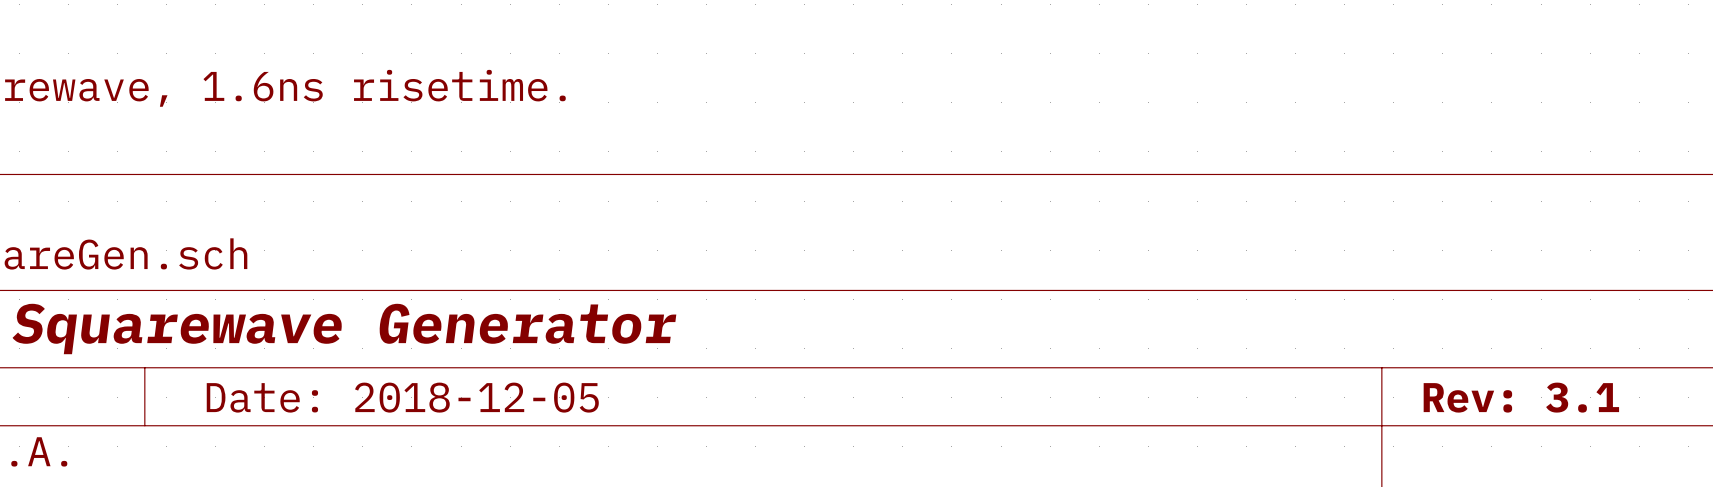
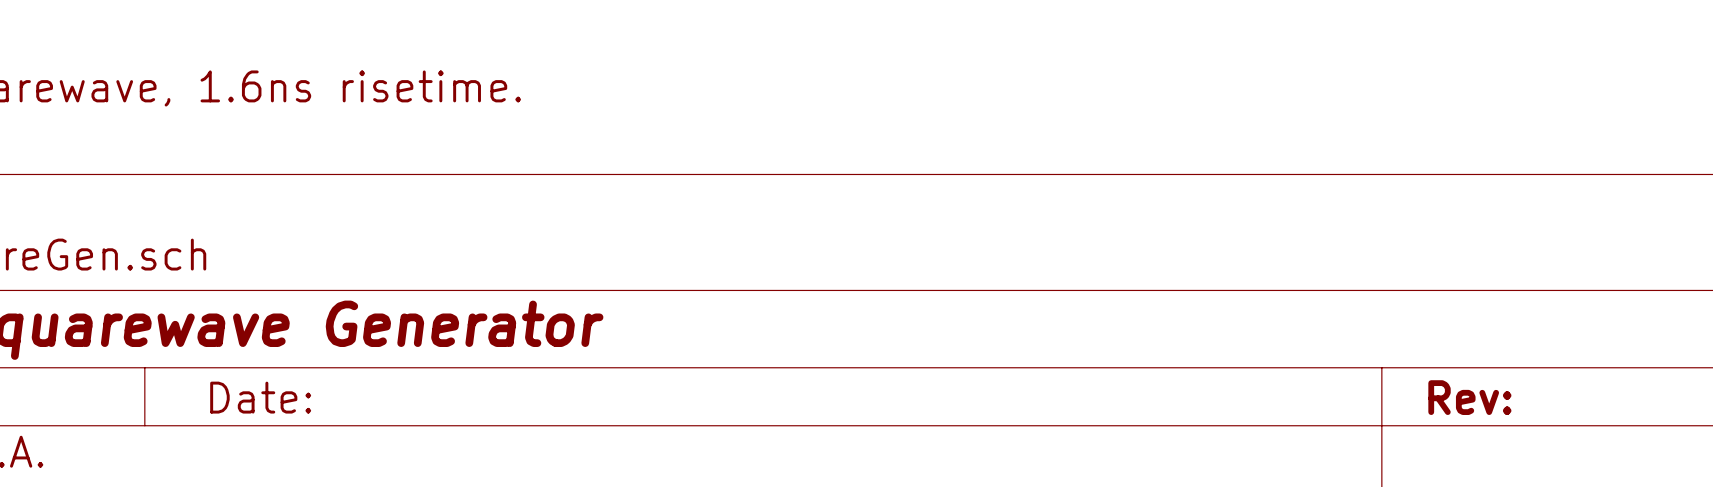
title block: Date: 2018-12-05 (402, 397) -> Date: (260, 397)
title block: Rev: 3.1 (1521, 397) -> Rev: (1469, 397)

